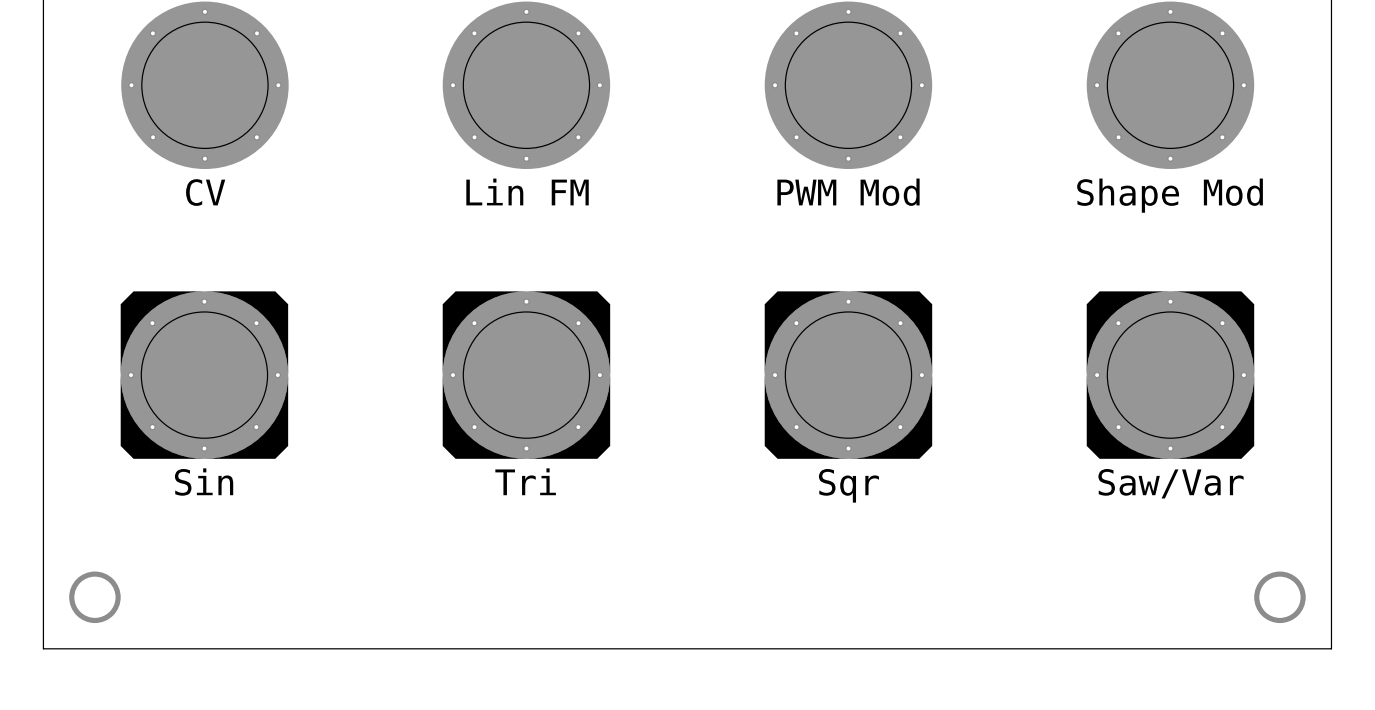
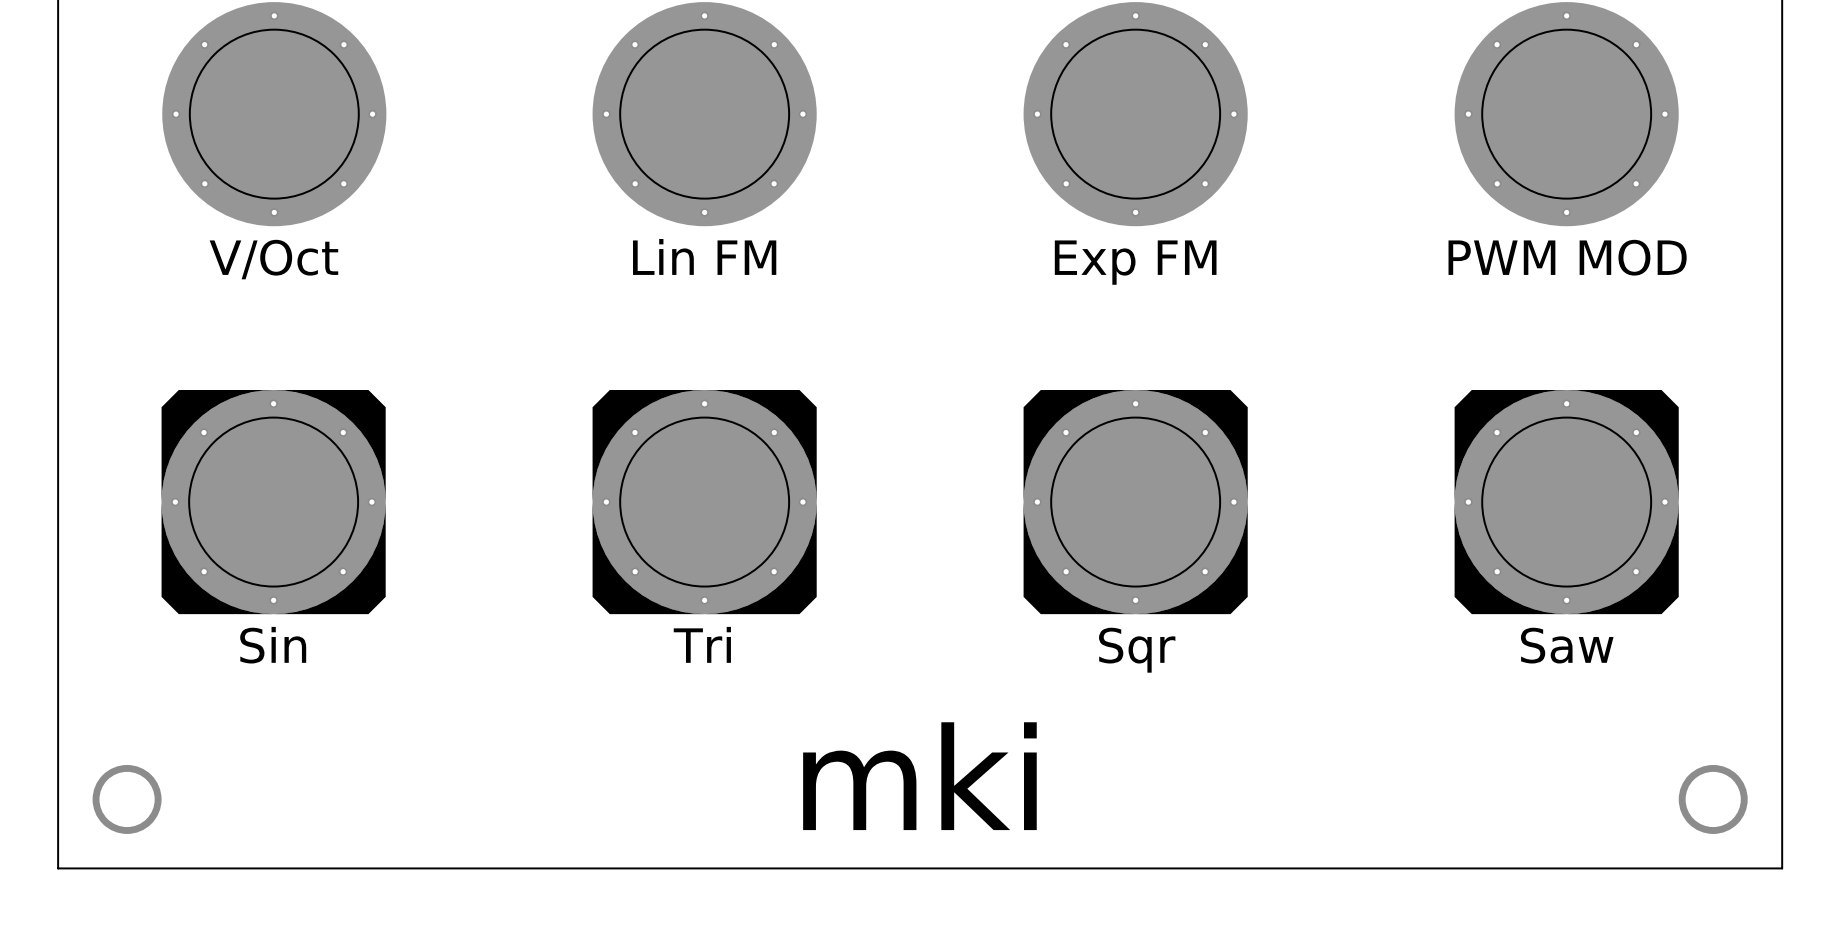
part value: CV (205, 192) -> V/Oct (273, 259)
part value: PWM Mod (848, 192) -> Exp FM (1135, 262)
part value: Shape Mod (1170, 195) -> PWM MOD (1567, 257)
part value: Saw/Var (1170, 483) -> Saw (1567, 645)
text: none -> mki (919, 776)

